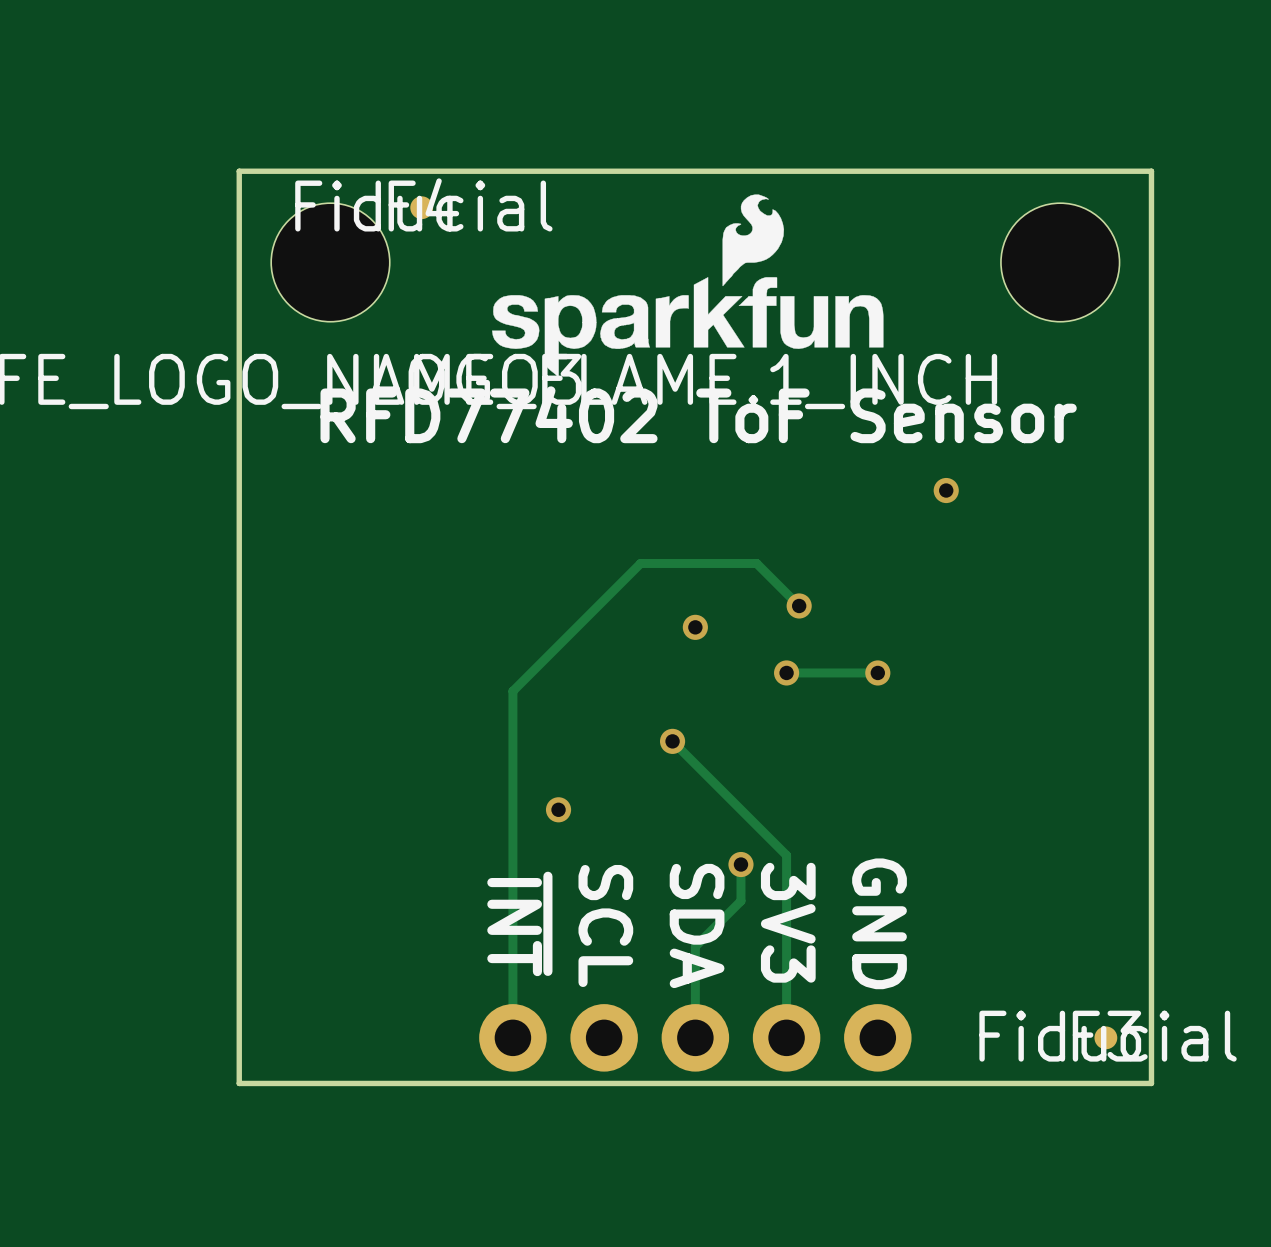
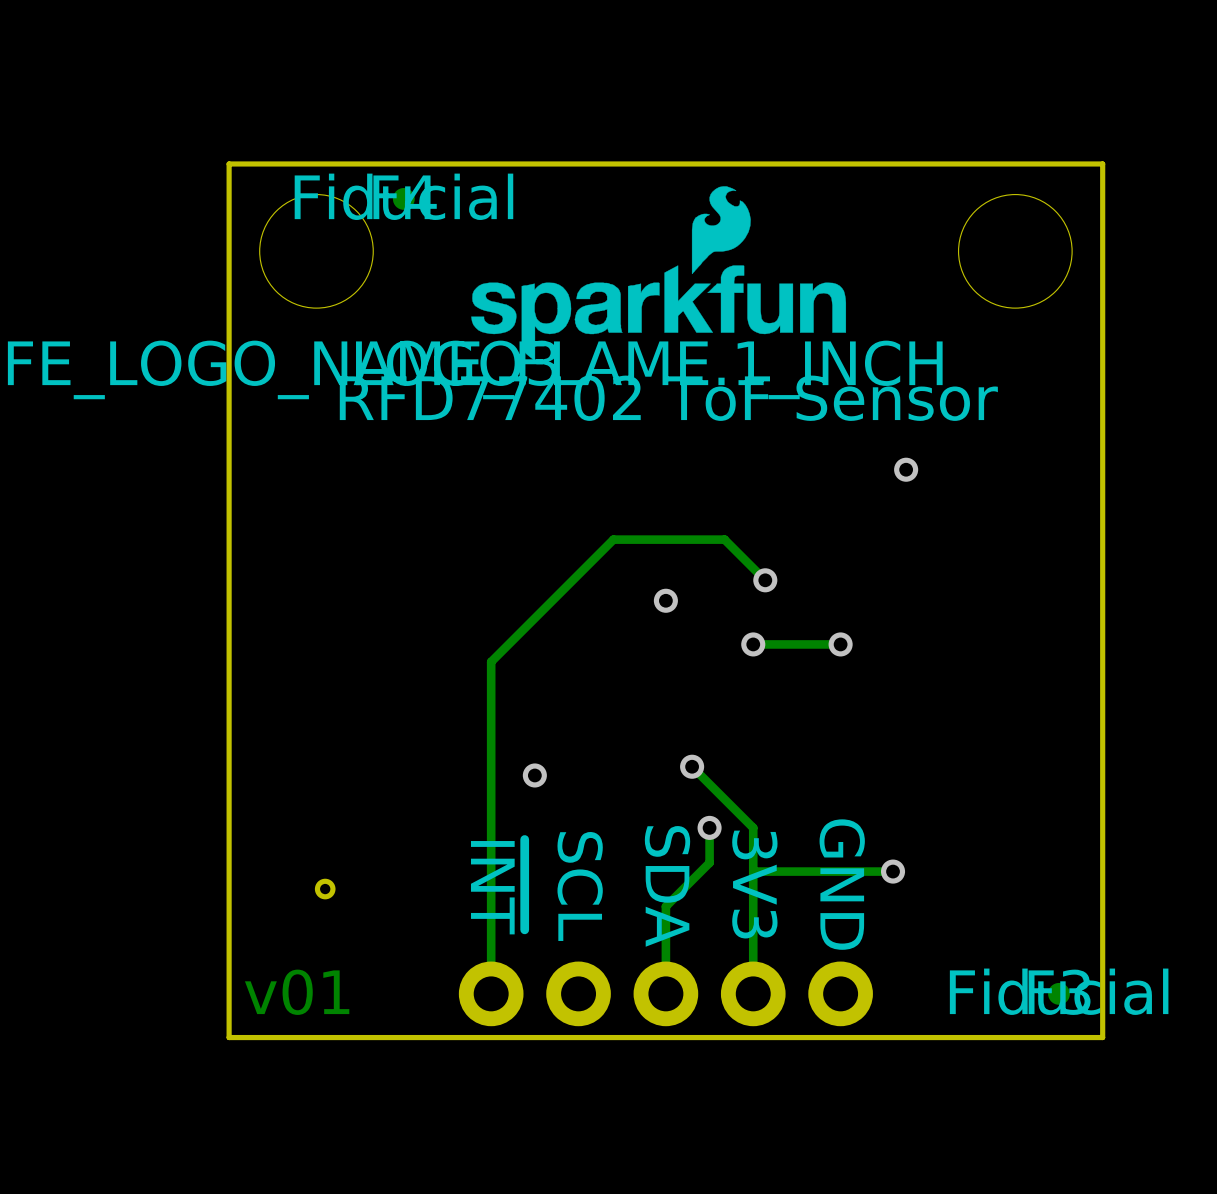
track: (672, 741) (786, 855) (786, 864) -> (692, 766) (753, 827)
via position: (672, 741) -> (692, 766)
track: none -> (893, 871) (753, 871)
via: none -> (893, 871)
part: none -> (325, 889)
text: none -> v01 (297, 992)

